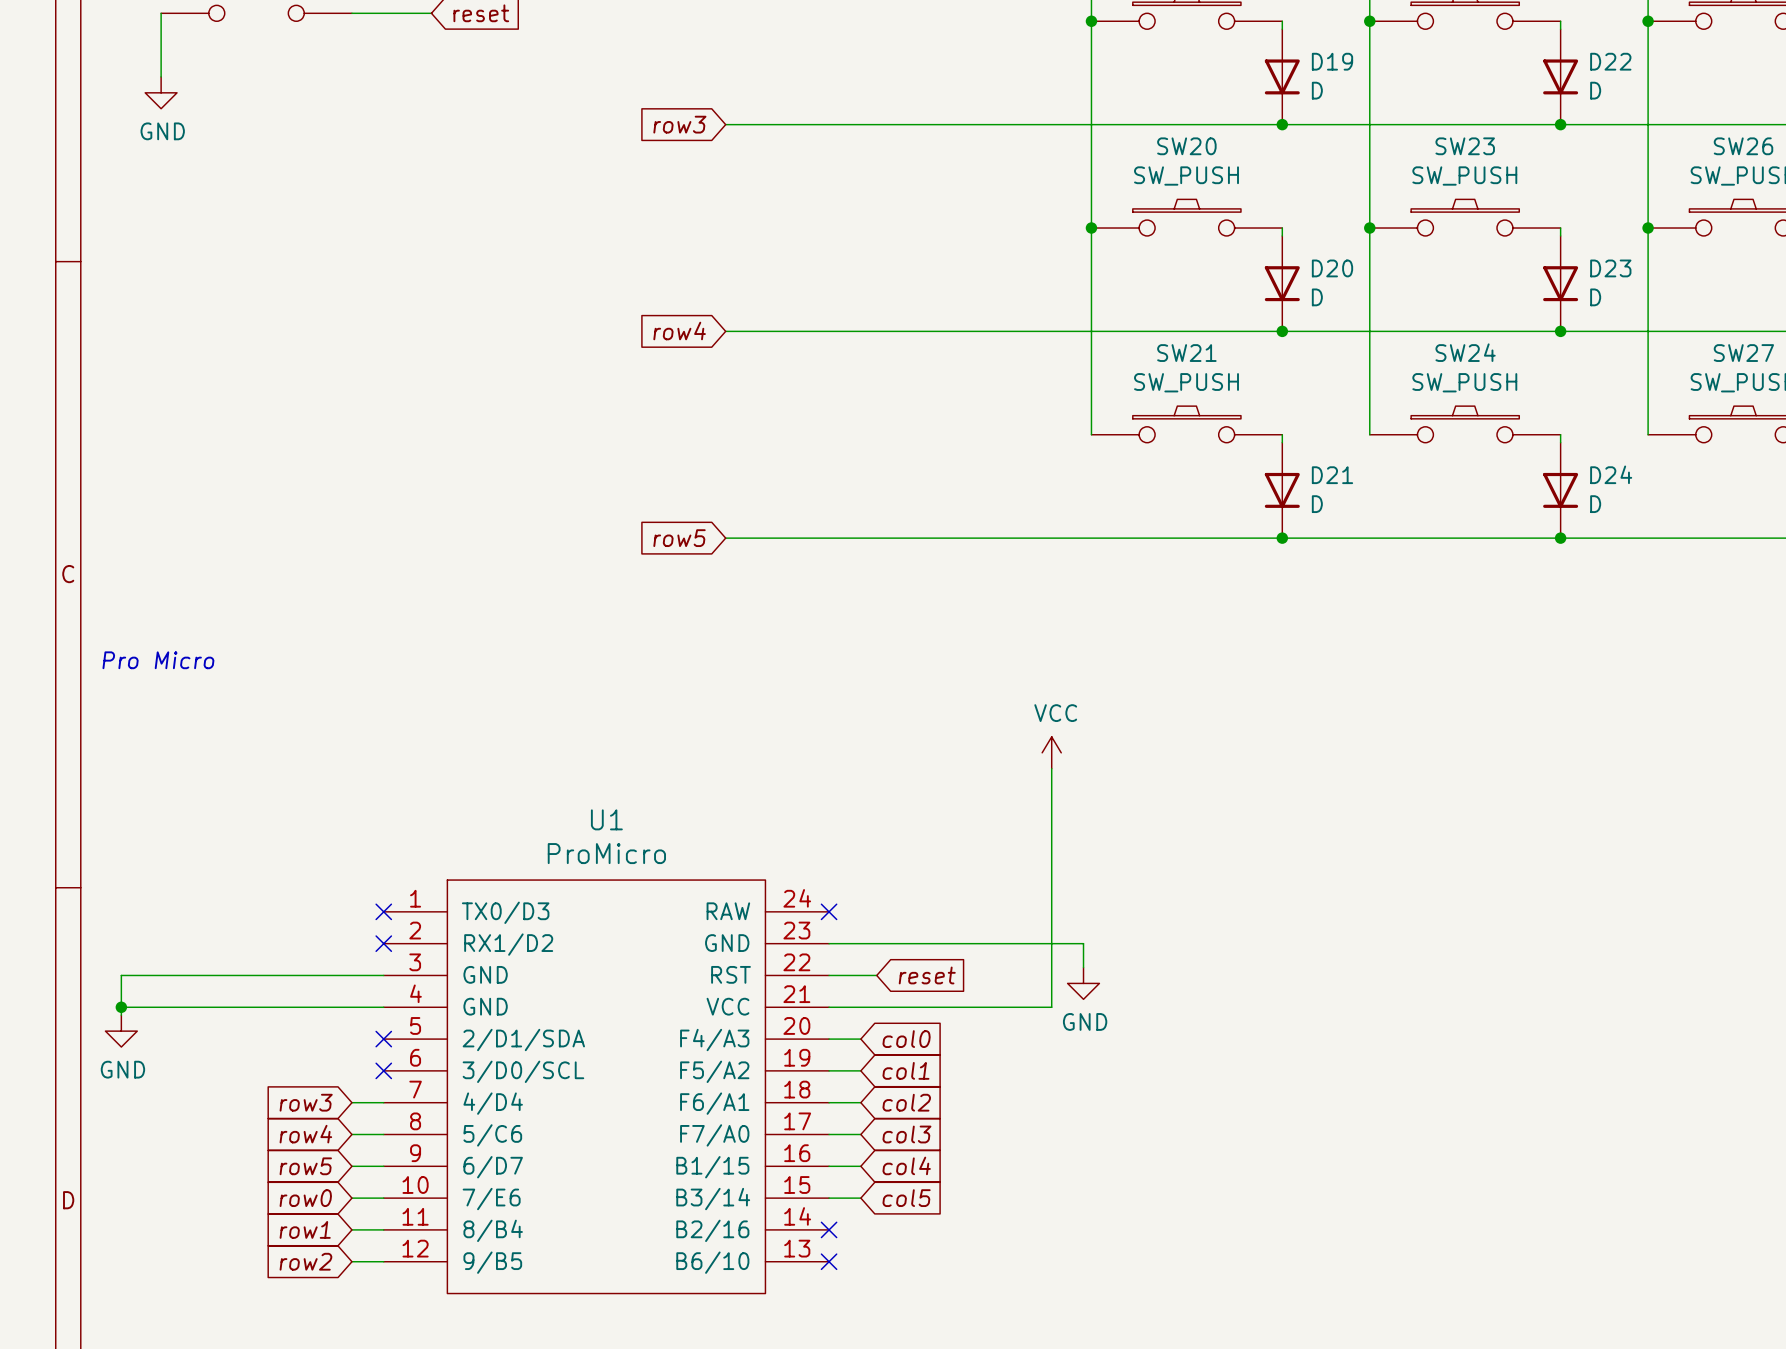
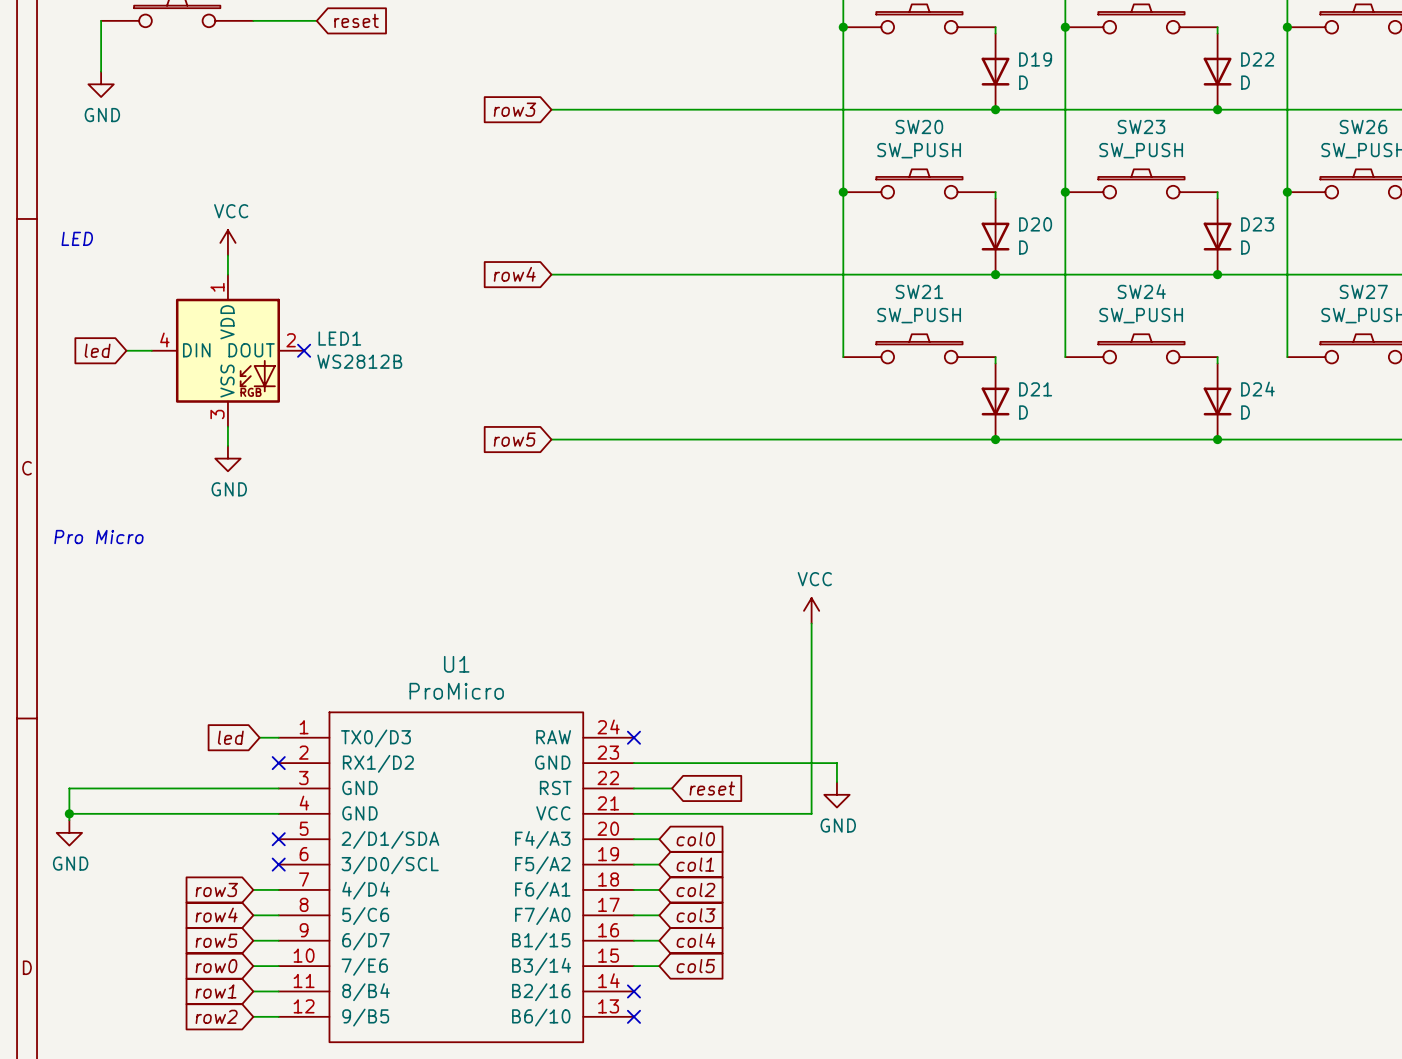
text: none -> LED (77, 238)
power symbol: none -> VCC (227, 242)
wire: none -> (227, 255) (227, 274)
global label: none -> led (97, 350)
wire: none -> (126, 350) (151, 350)
LED1: none -> WS2812B (227, 350)
no-connect mark: none -> (304, 350)
wire: none -> (227, 426) (227, 445)
power symbol: none -> GND (227, 458)
global label: none -> led (230, 737)
wire: none -> (259, 737) (278, 737)
no-connect mark: (383, 911) -> none

